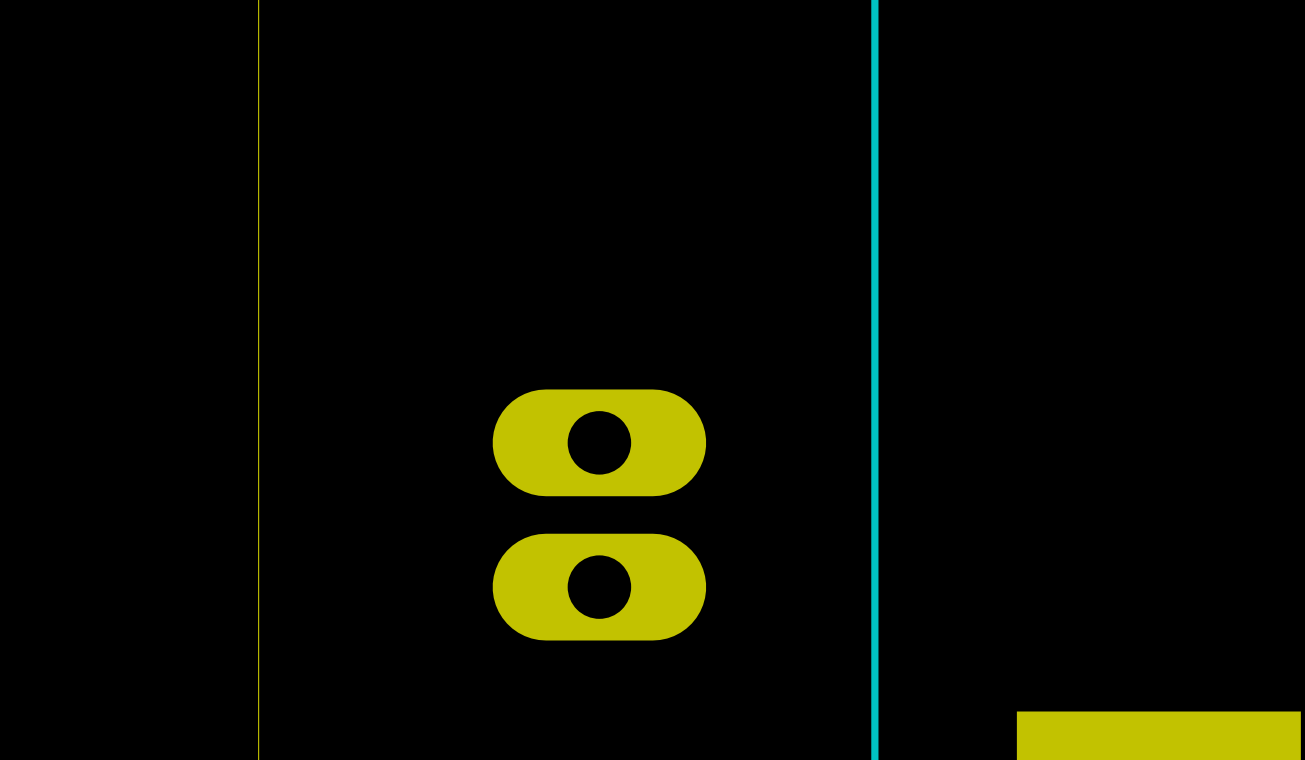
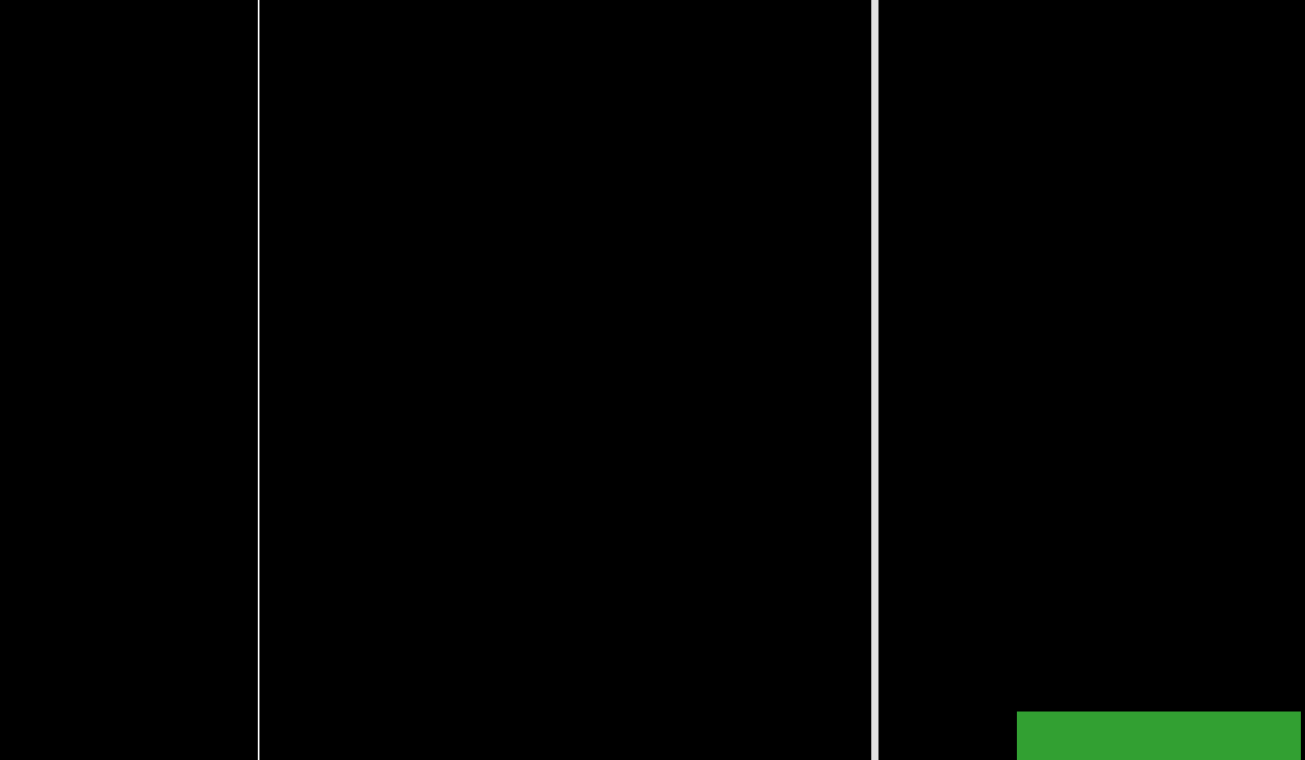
part: (599, 514) -> none

